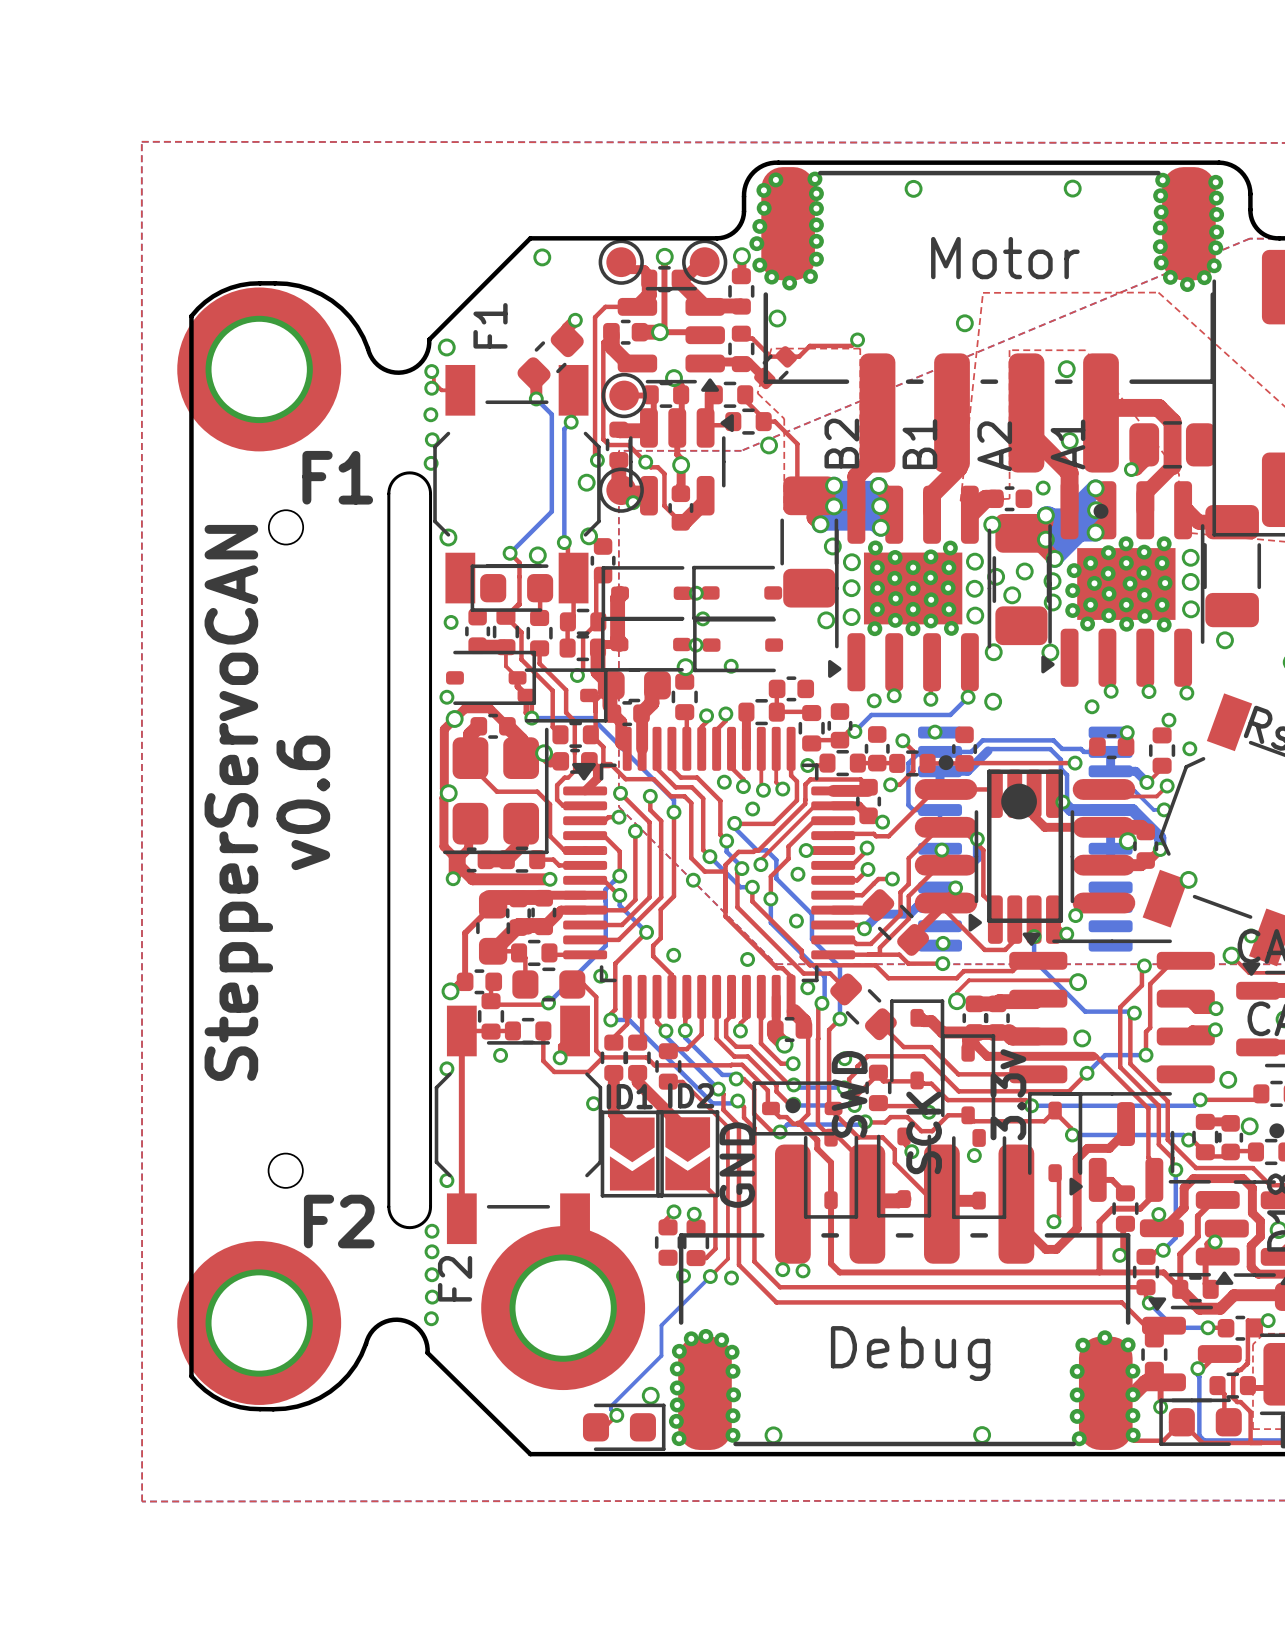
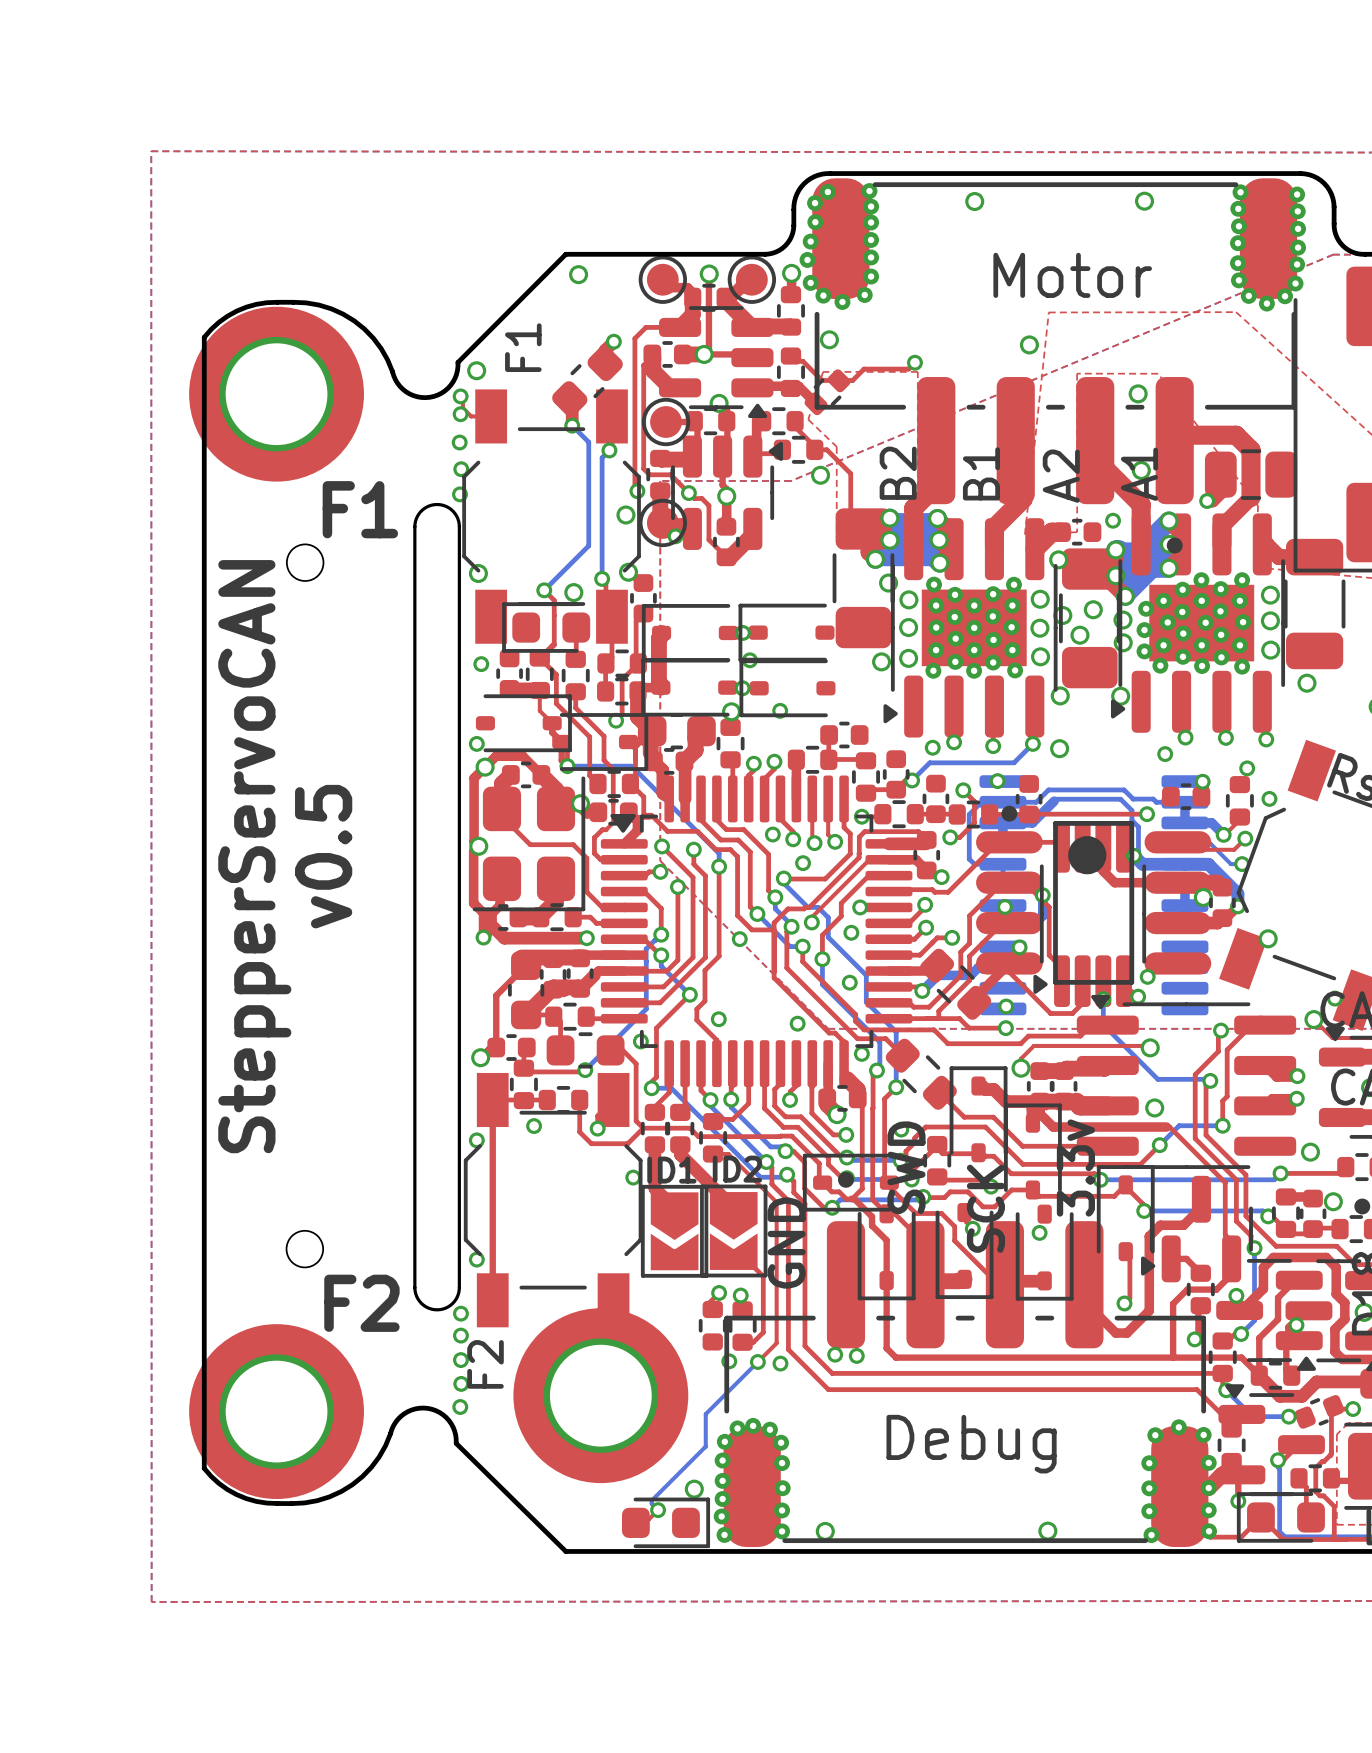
text: v0.6 (303, 802) -> v0.5 (323, 856)
part rotation: 0° (1240, 1328) -> 22° counterclockwise (1319, 1411)

